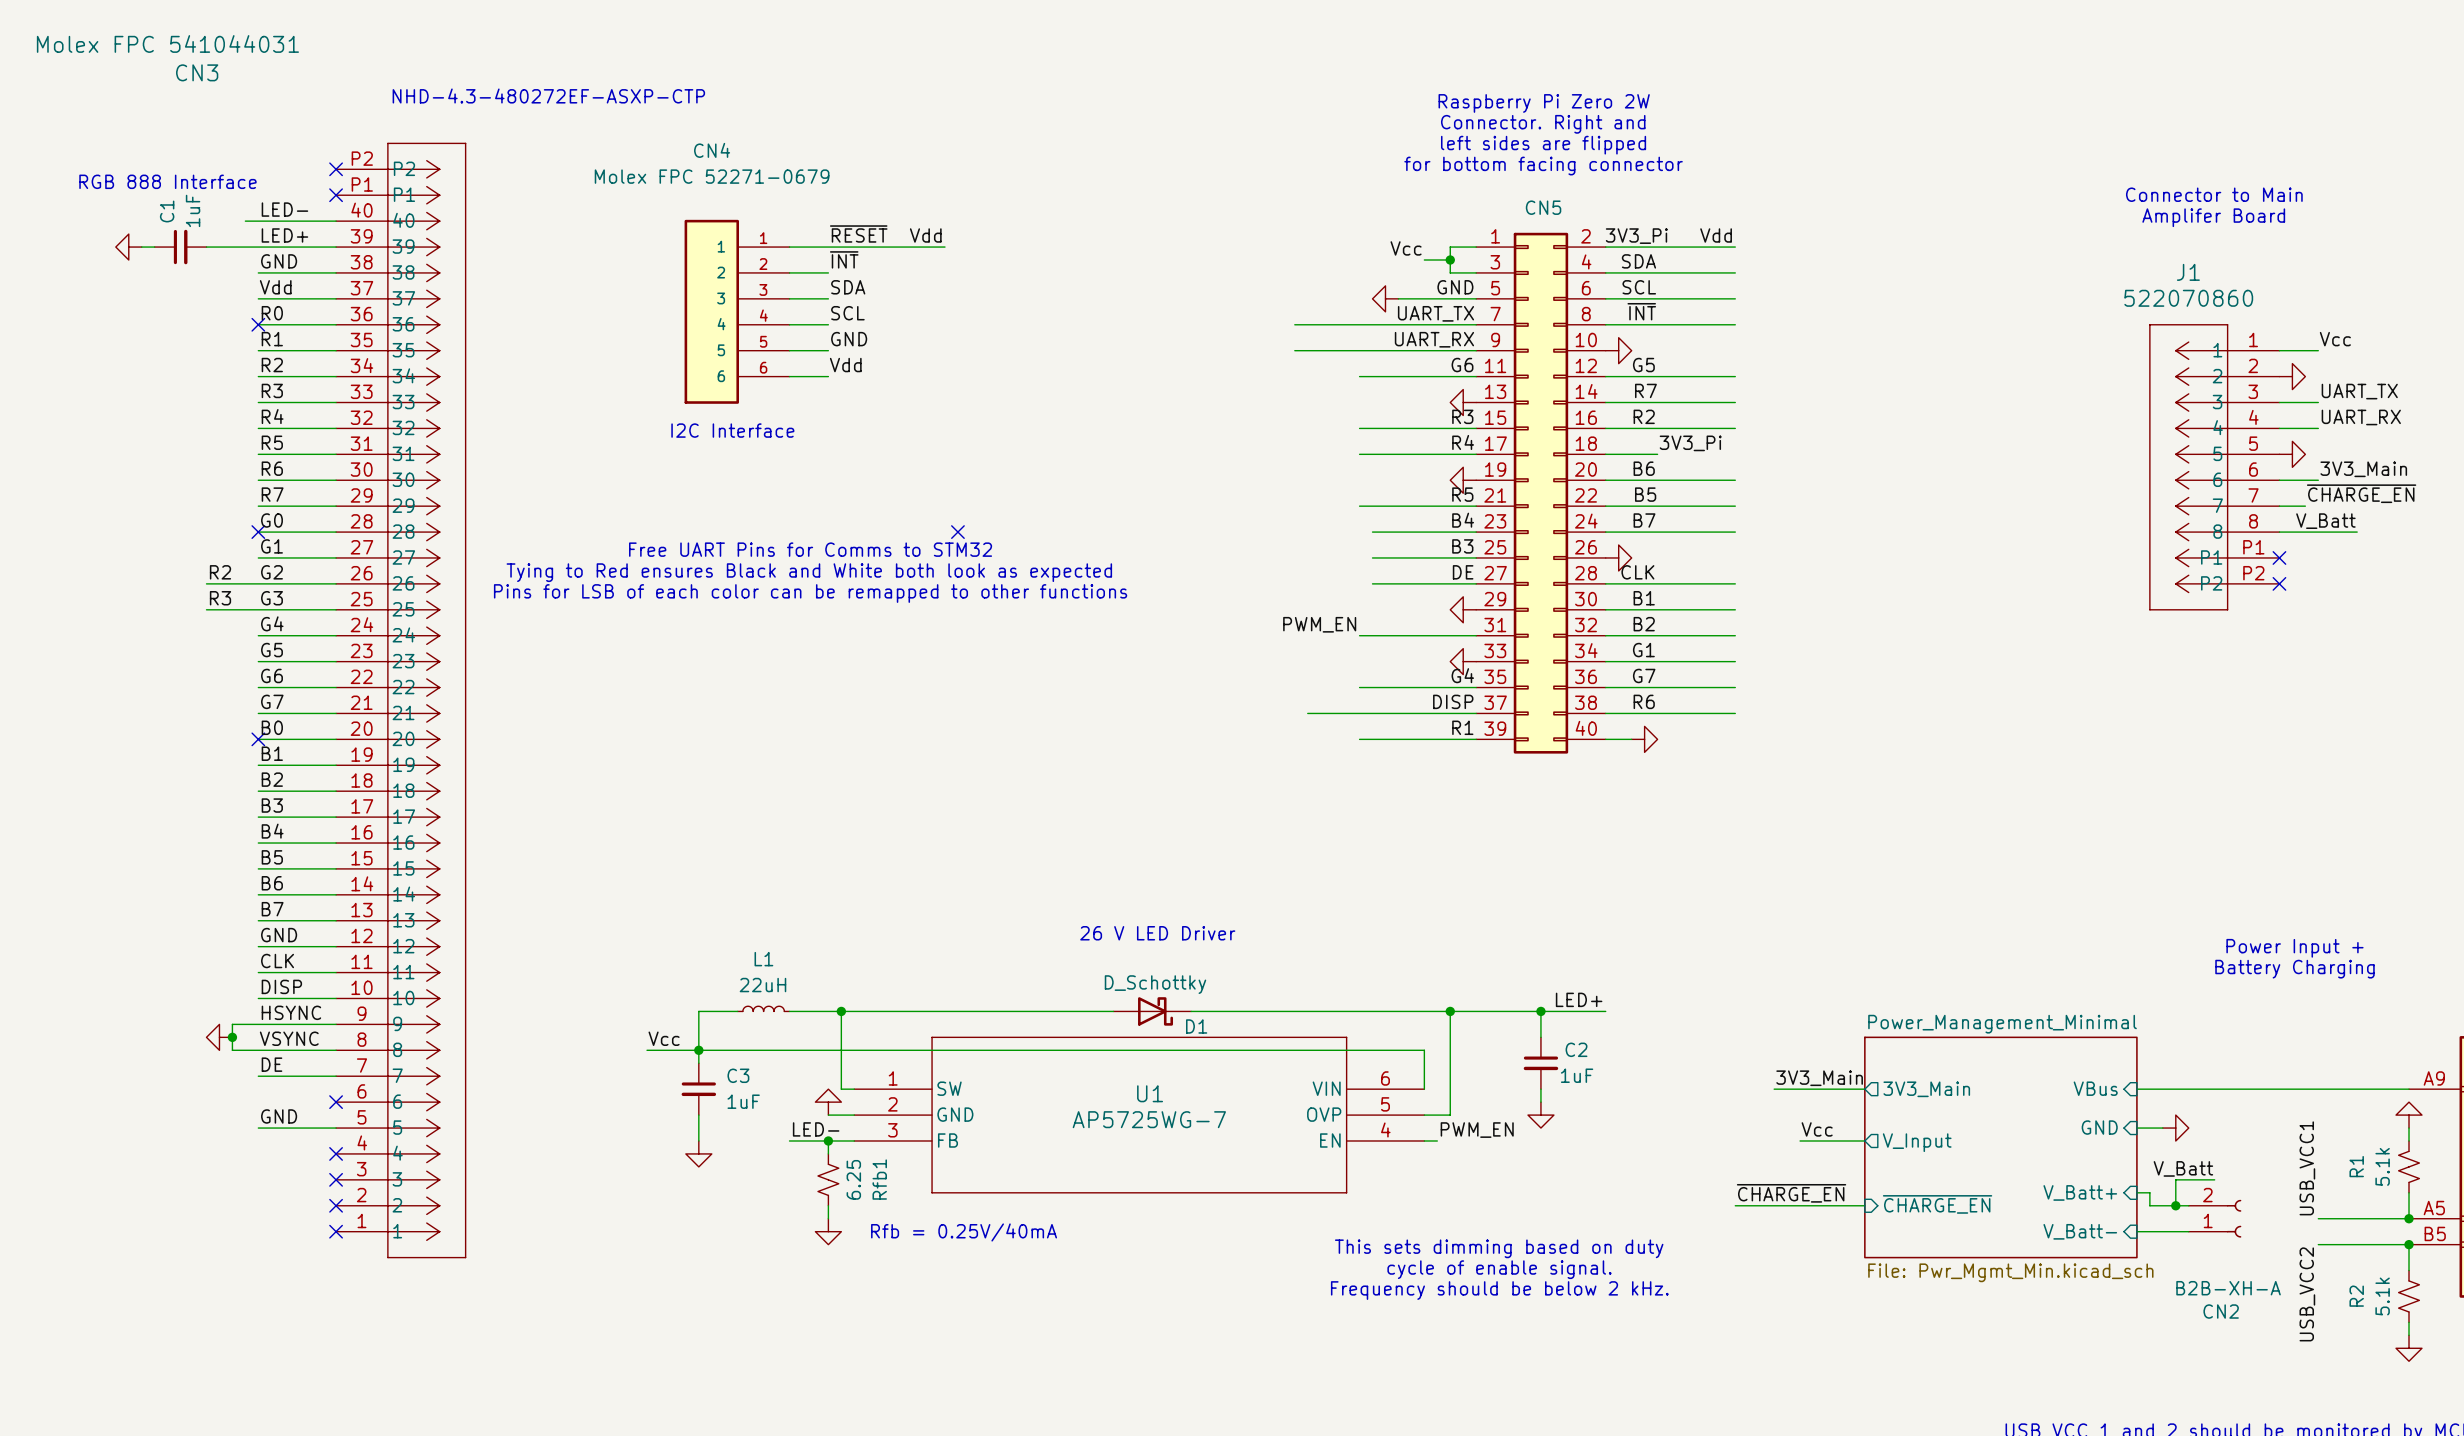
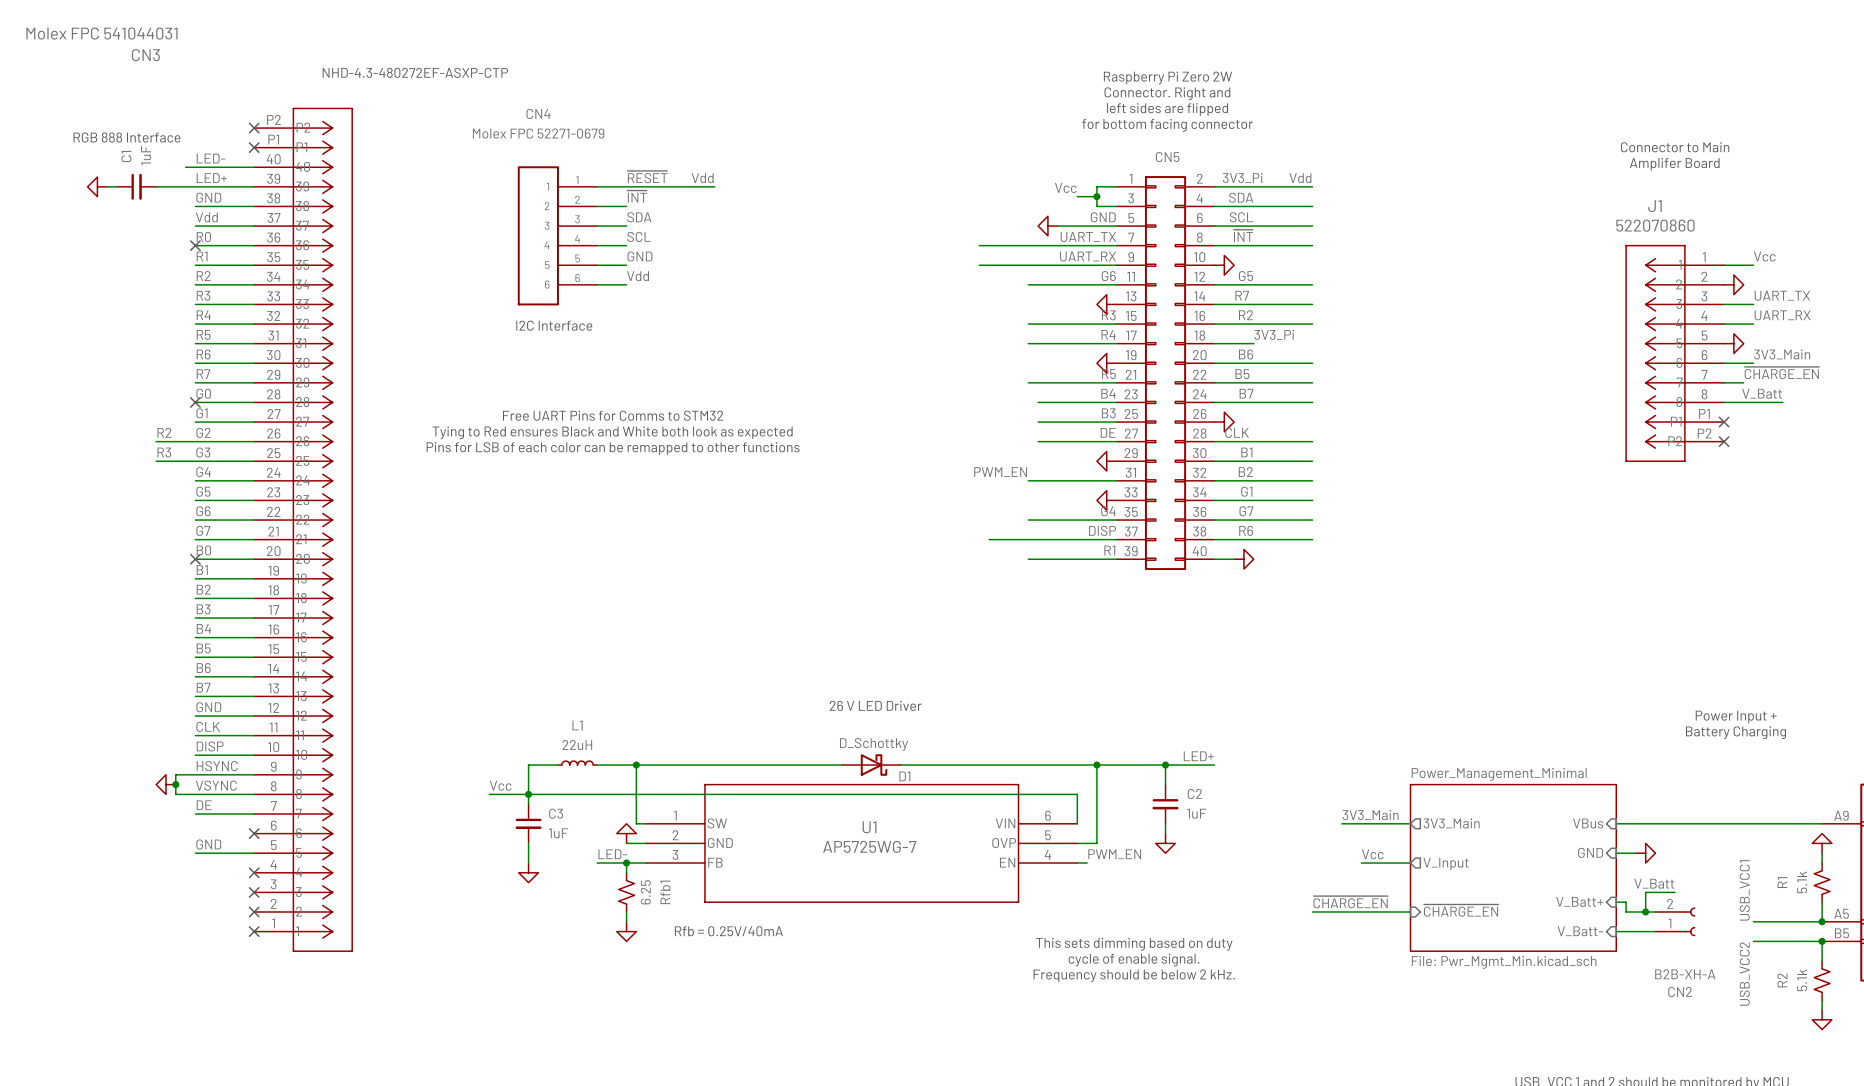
no-connect mark: (957, 532) -> none

